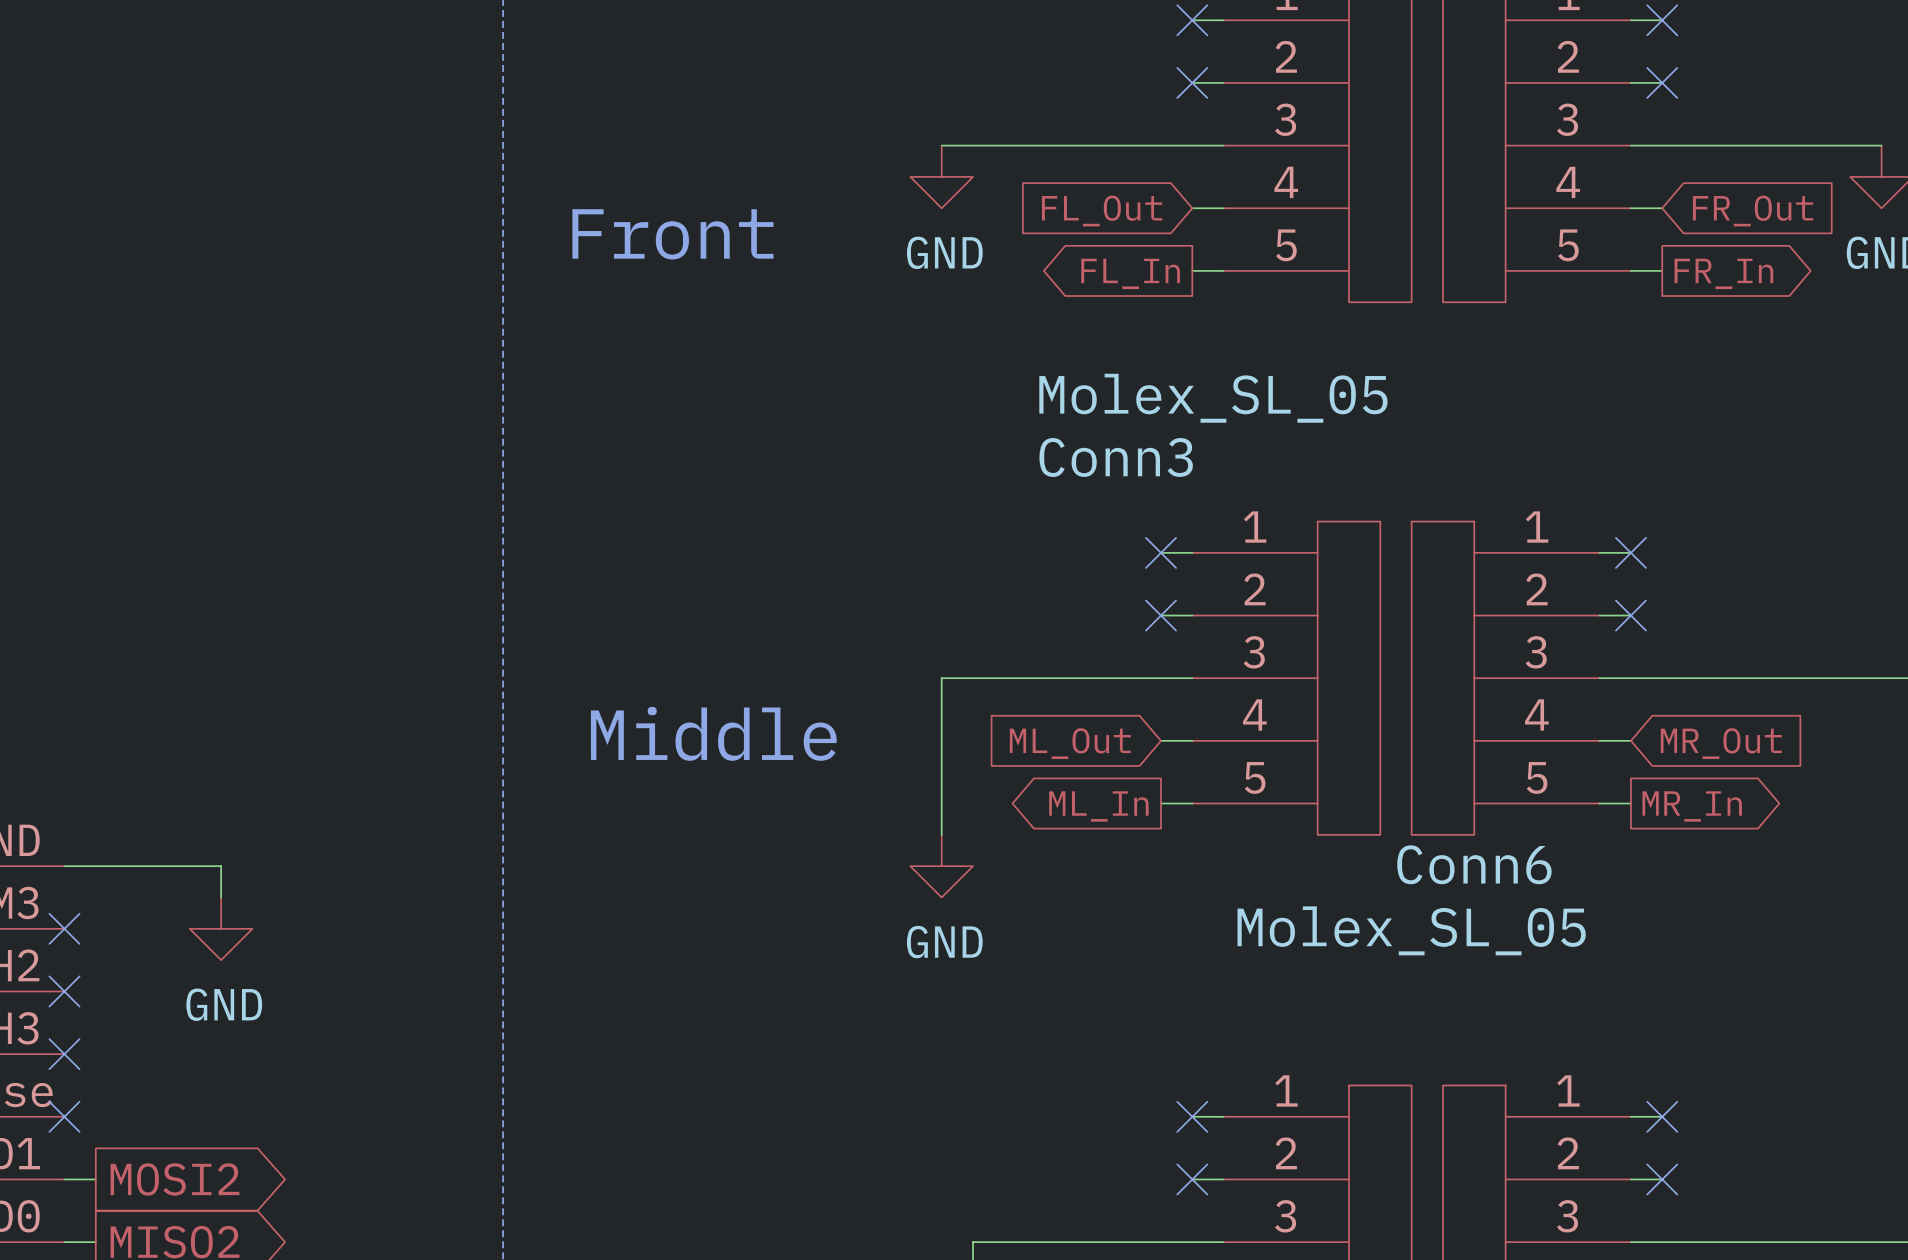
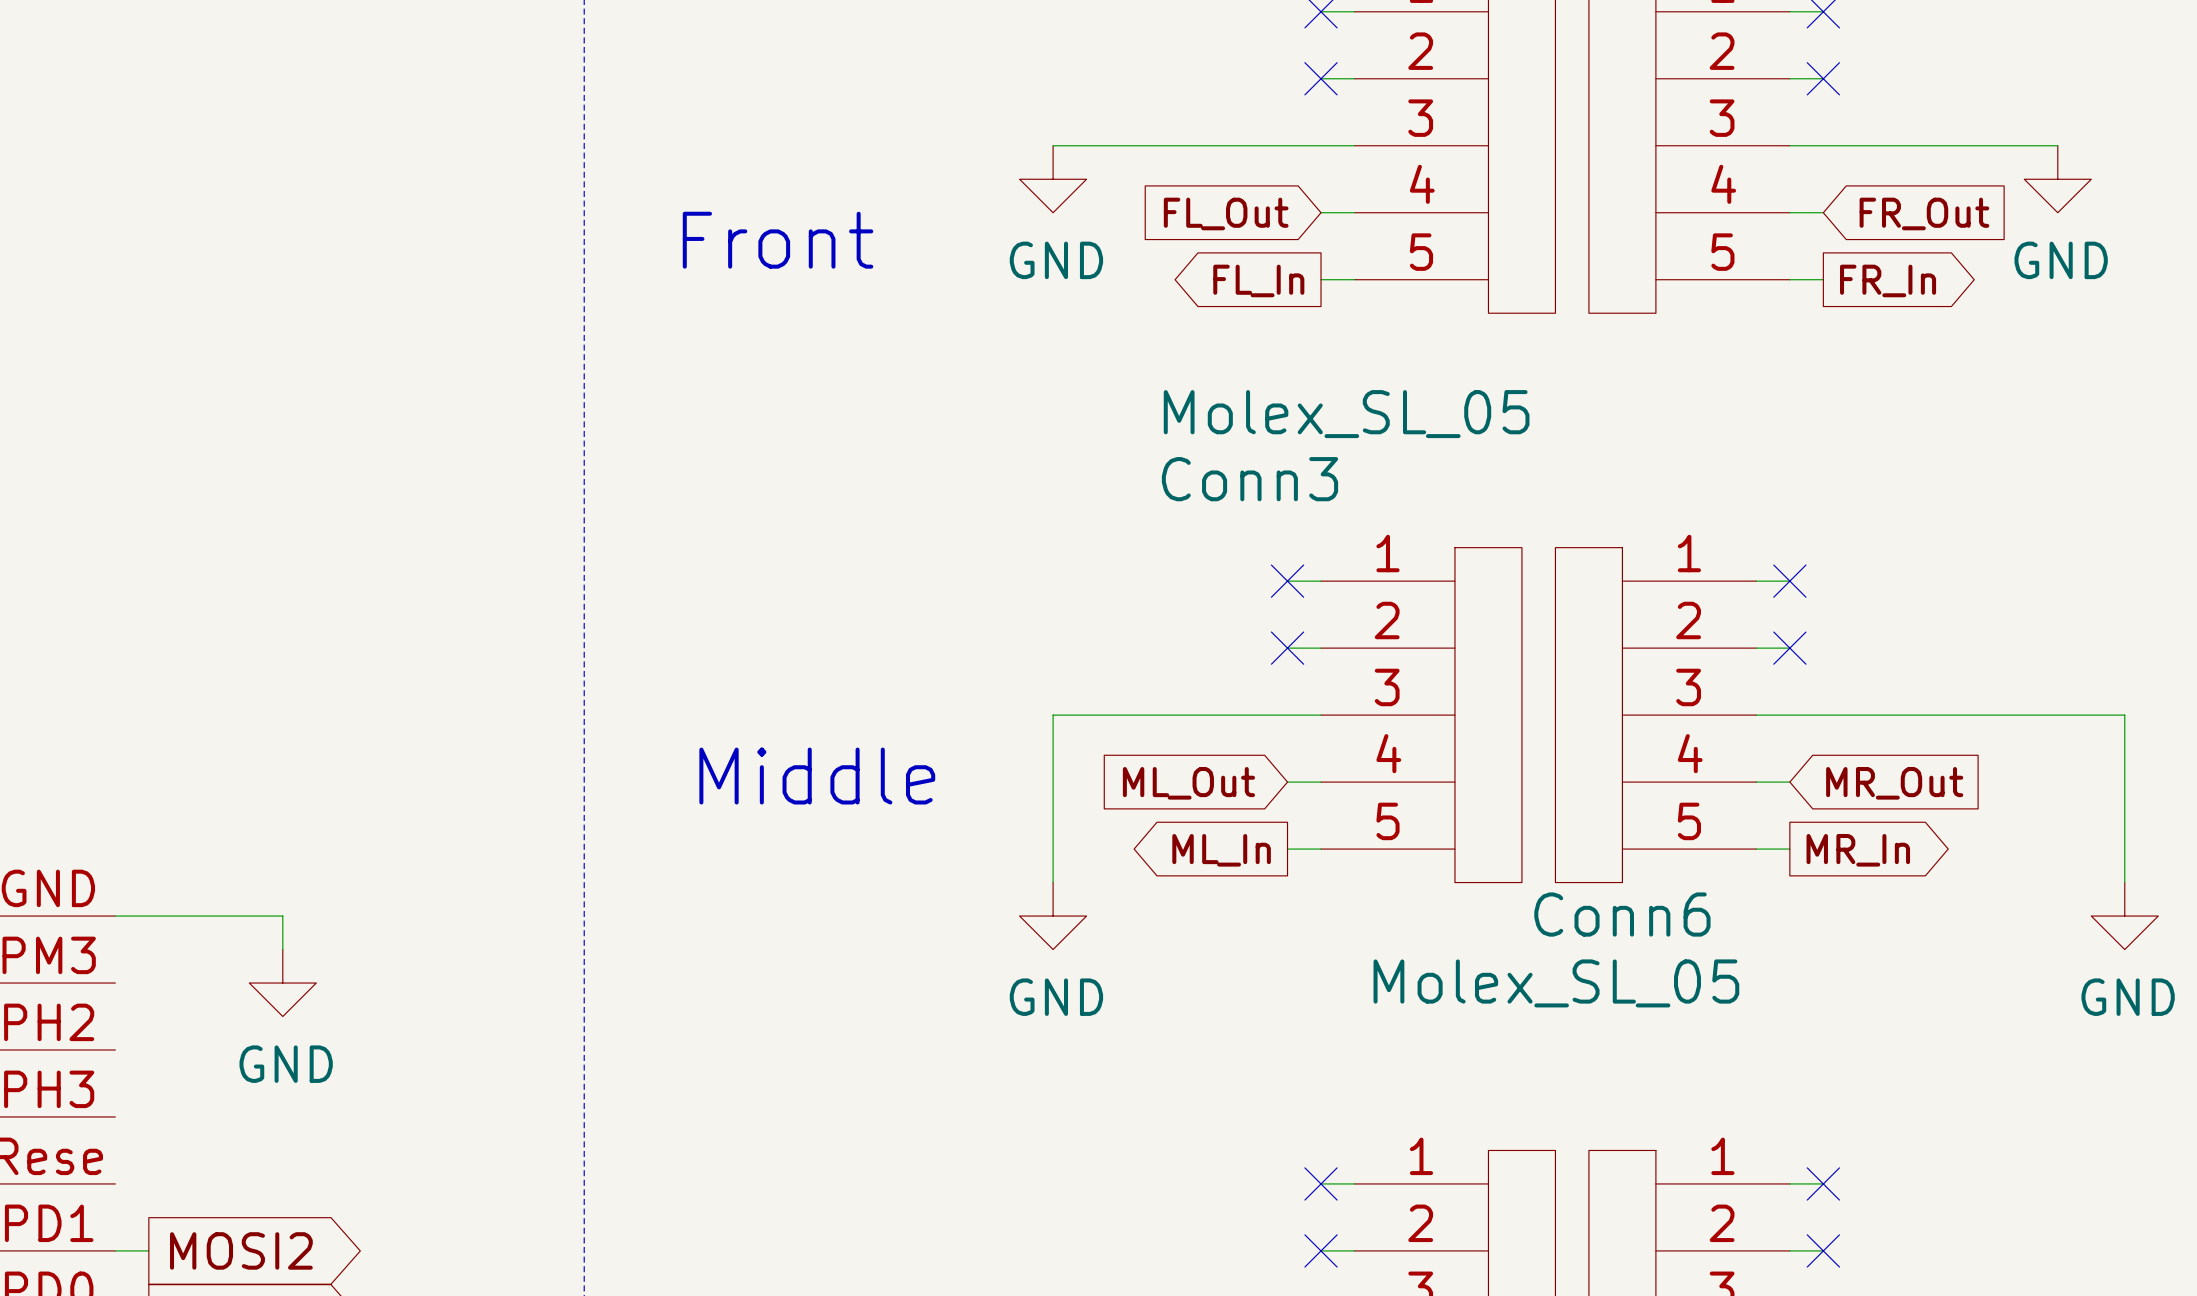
no-connect mark: (64, 928) -> none
no-connect mark: (64, 991) -> none
no-connect mark: (64, 1054) -> none
no-connect mark: (64, 1116) -> none

